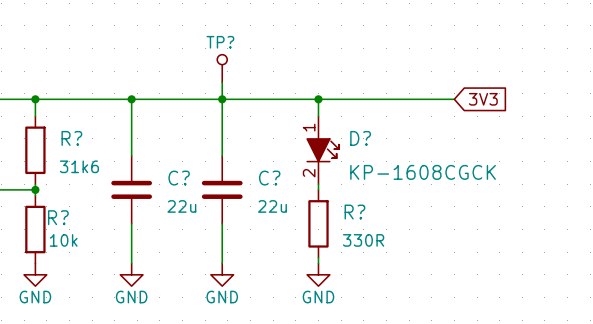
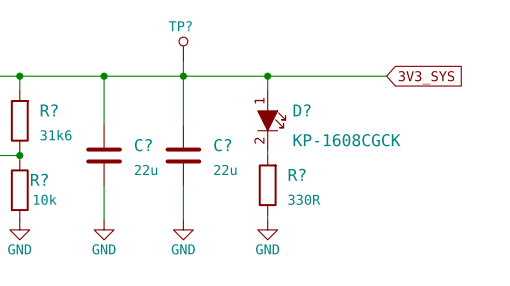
global label: 3V3 (483, 99) -> 3V3_SYS (426, 77)

